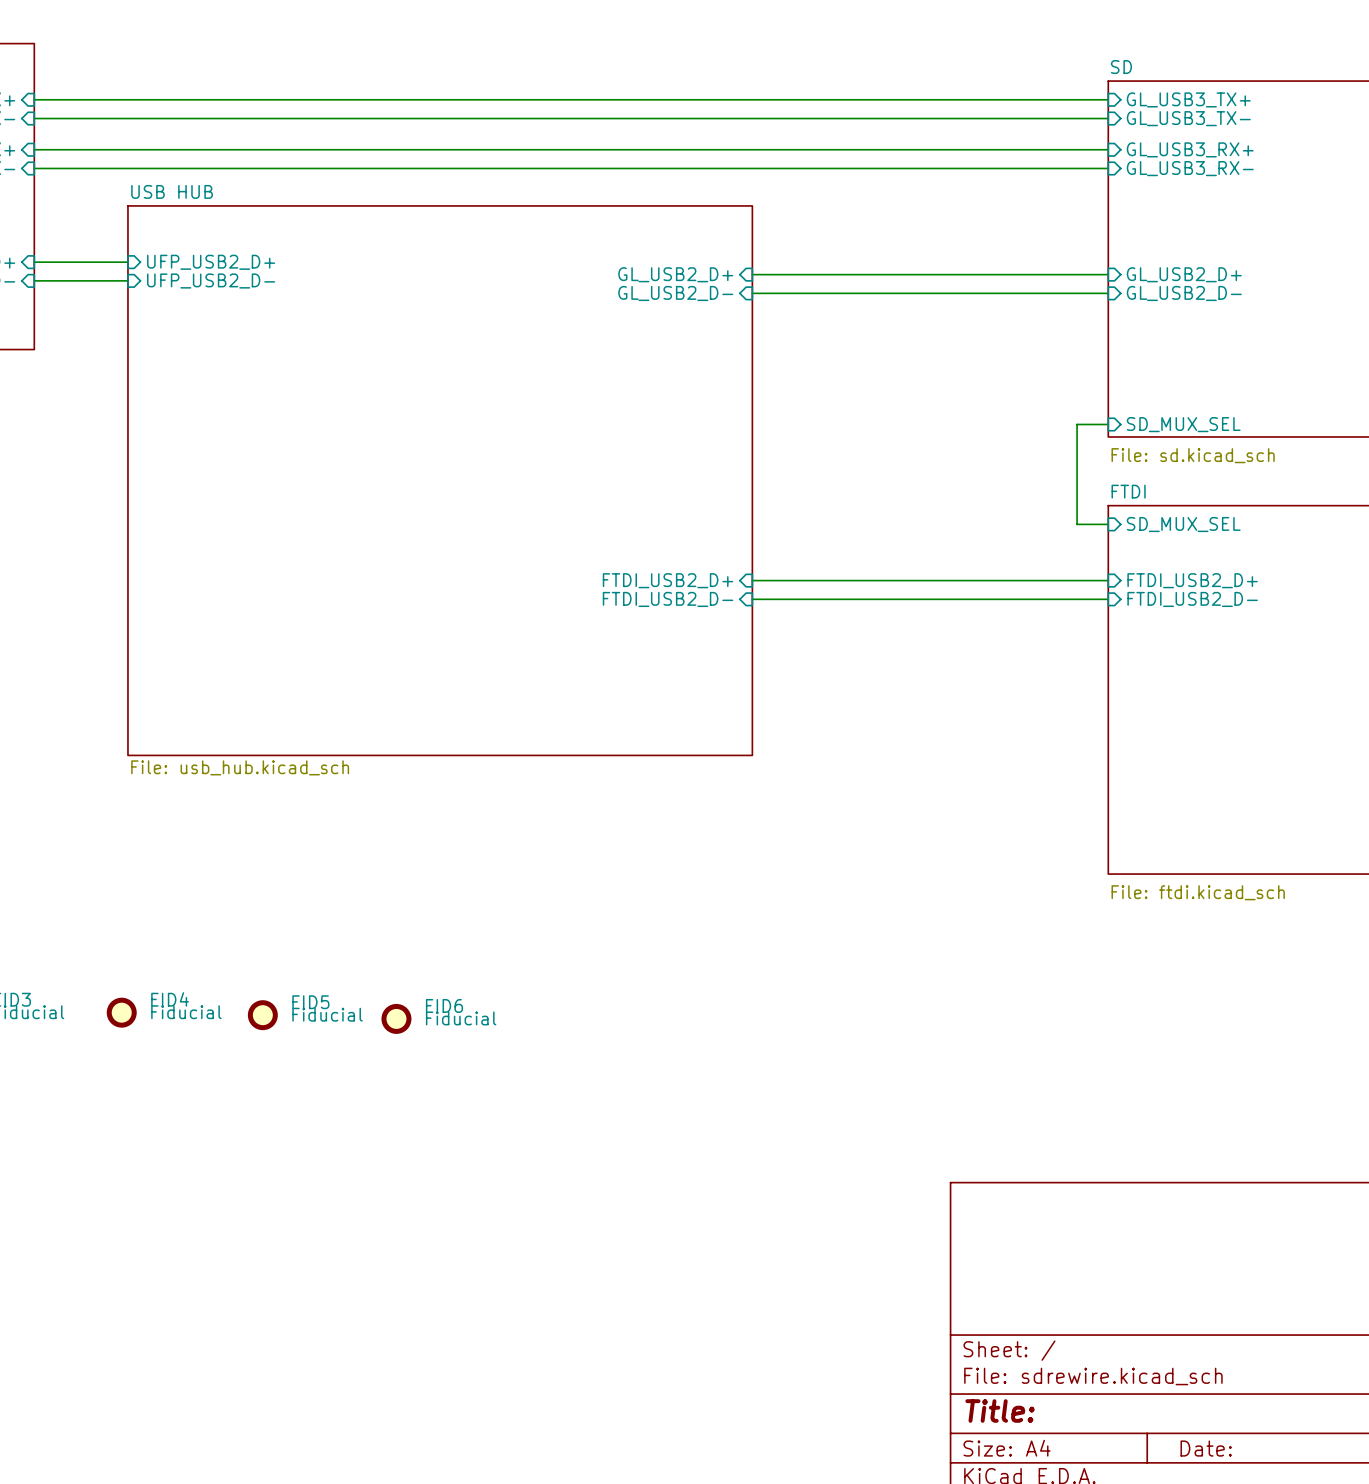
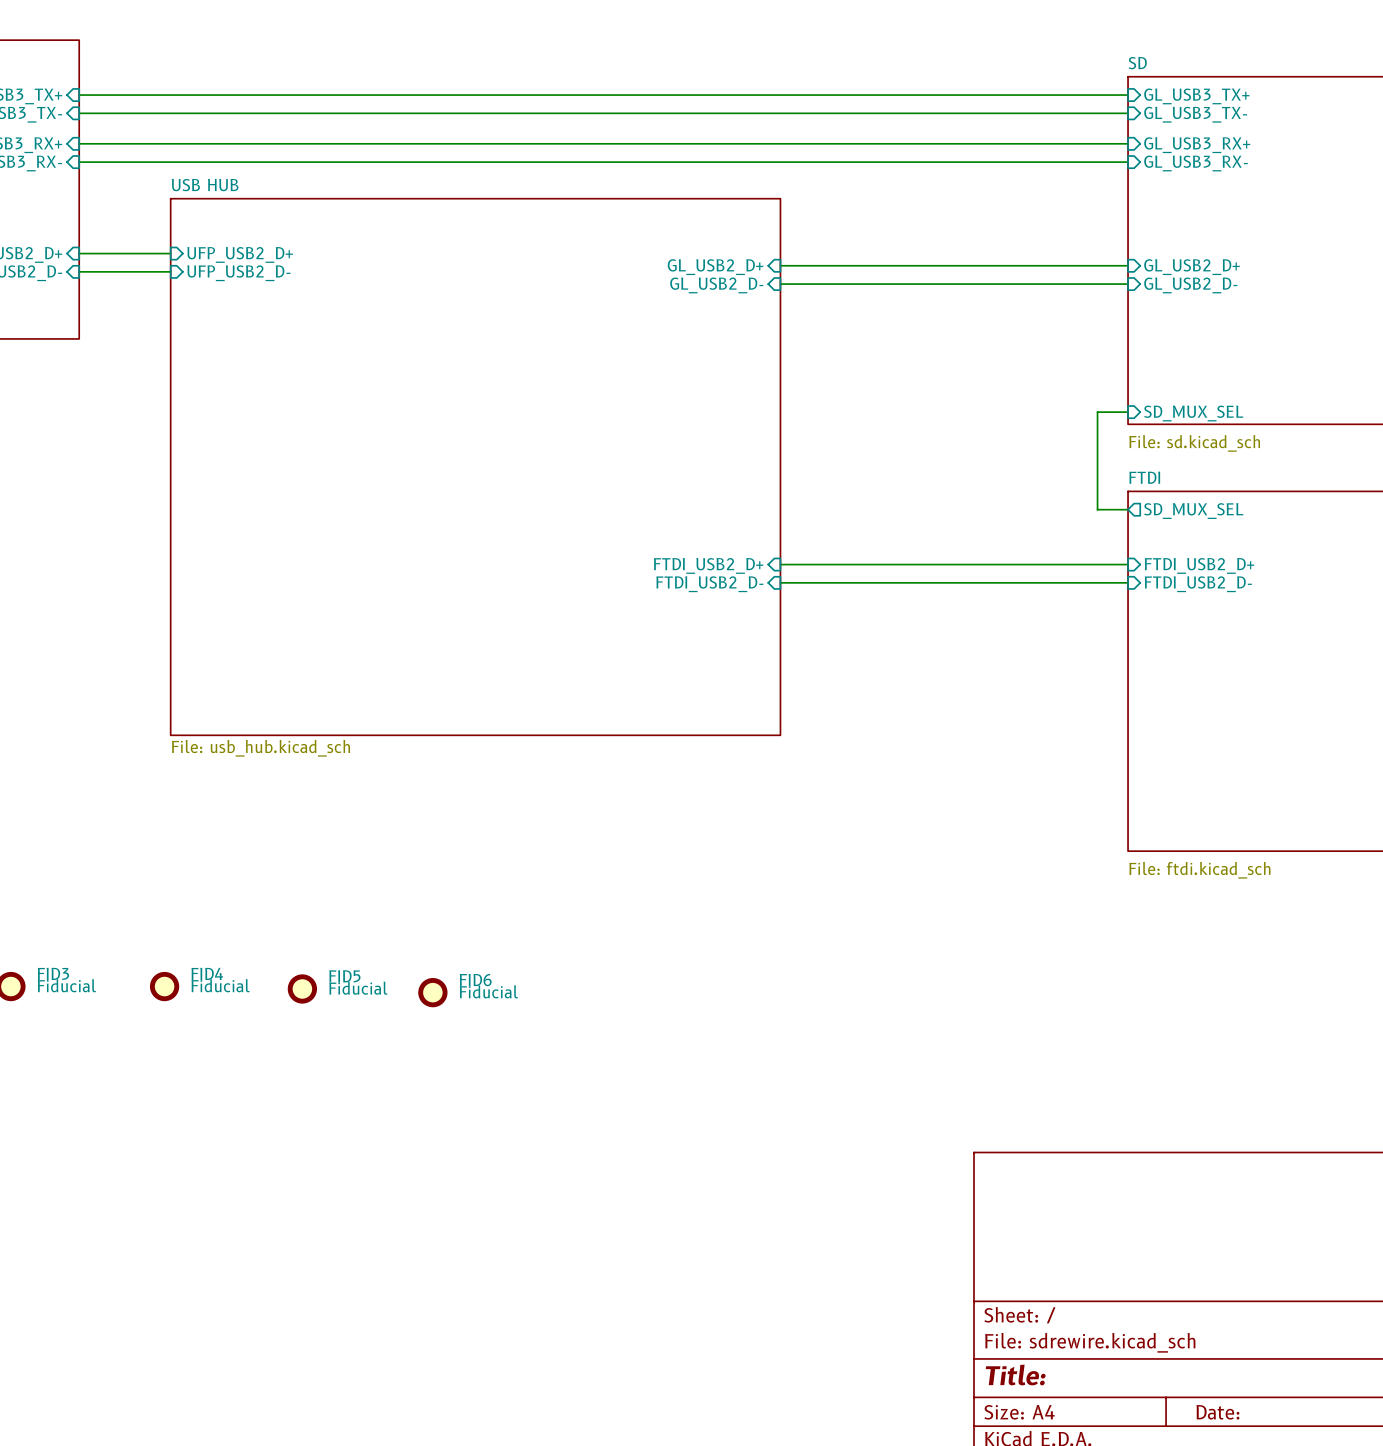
sheet pin shape: input (1183, 524) -> output (1193, 511)

